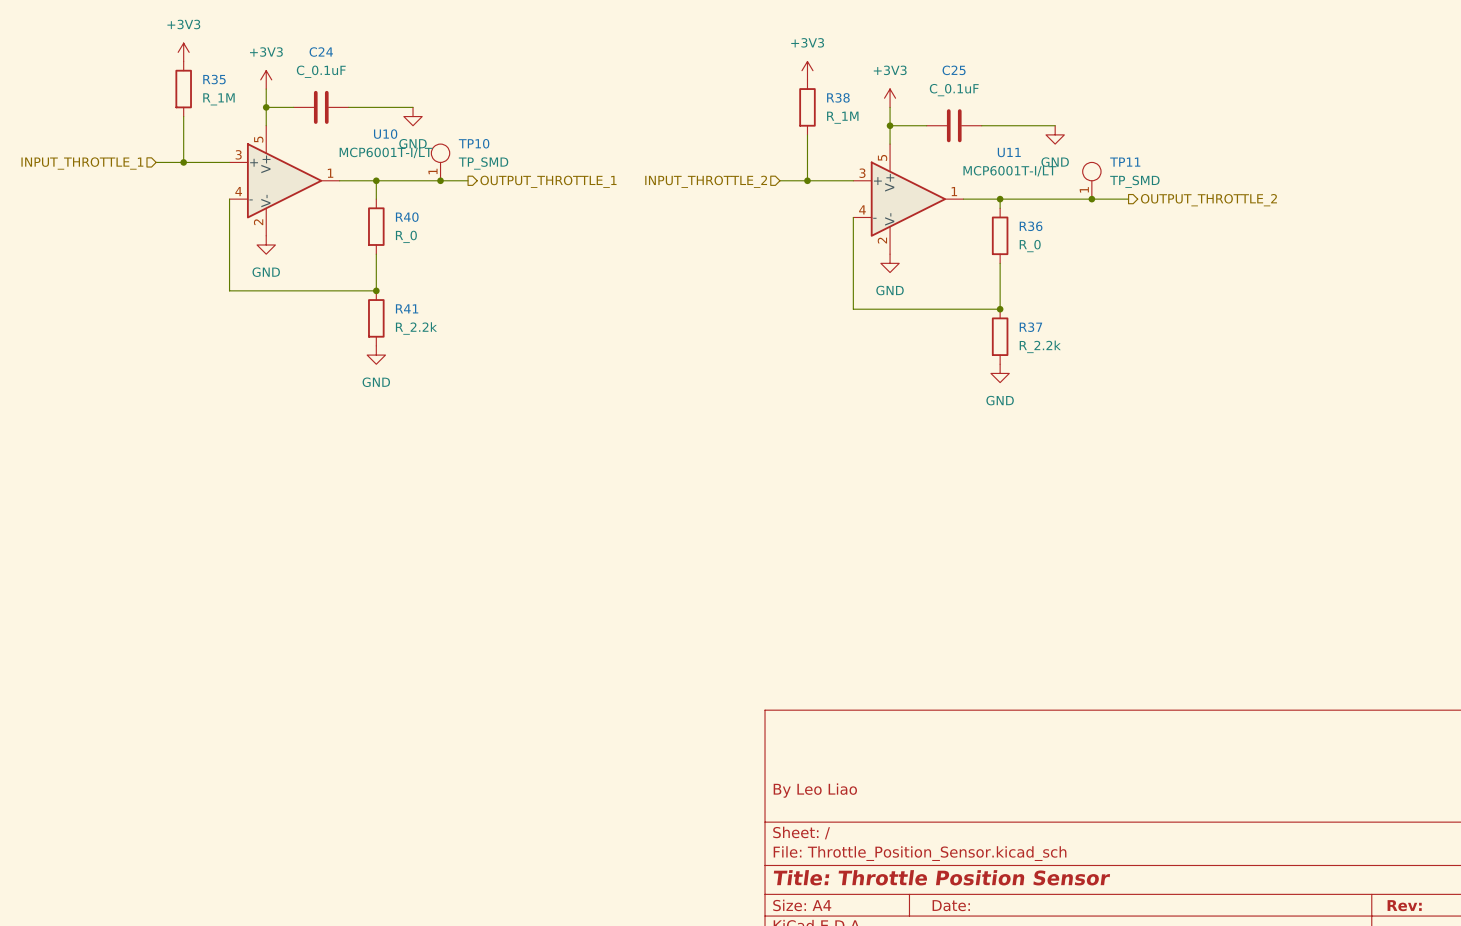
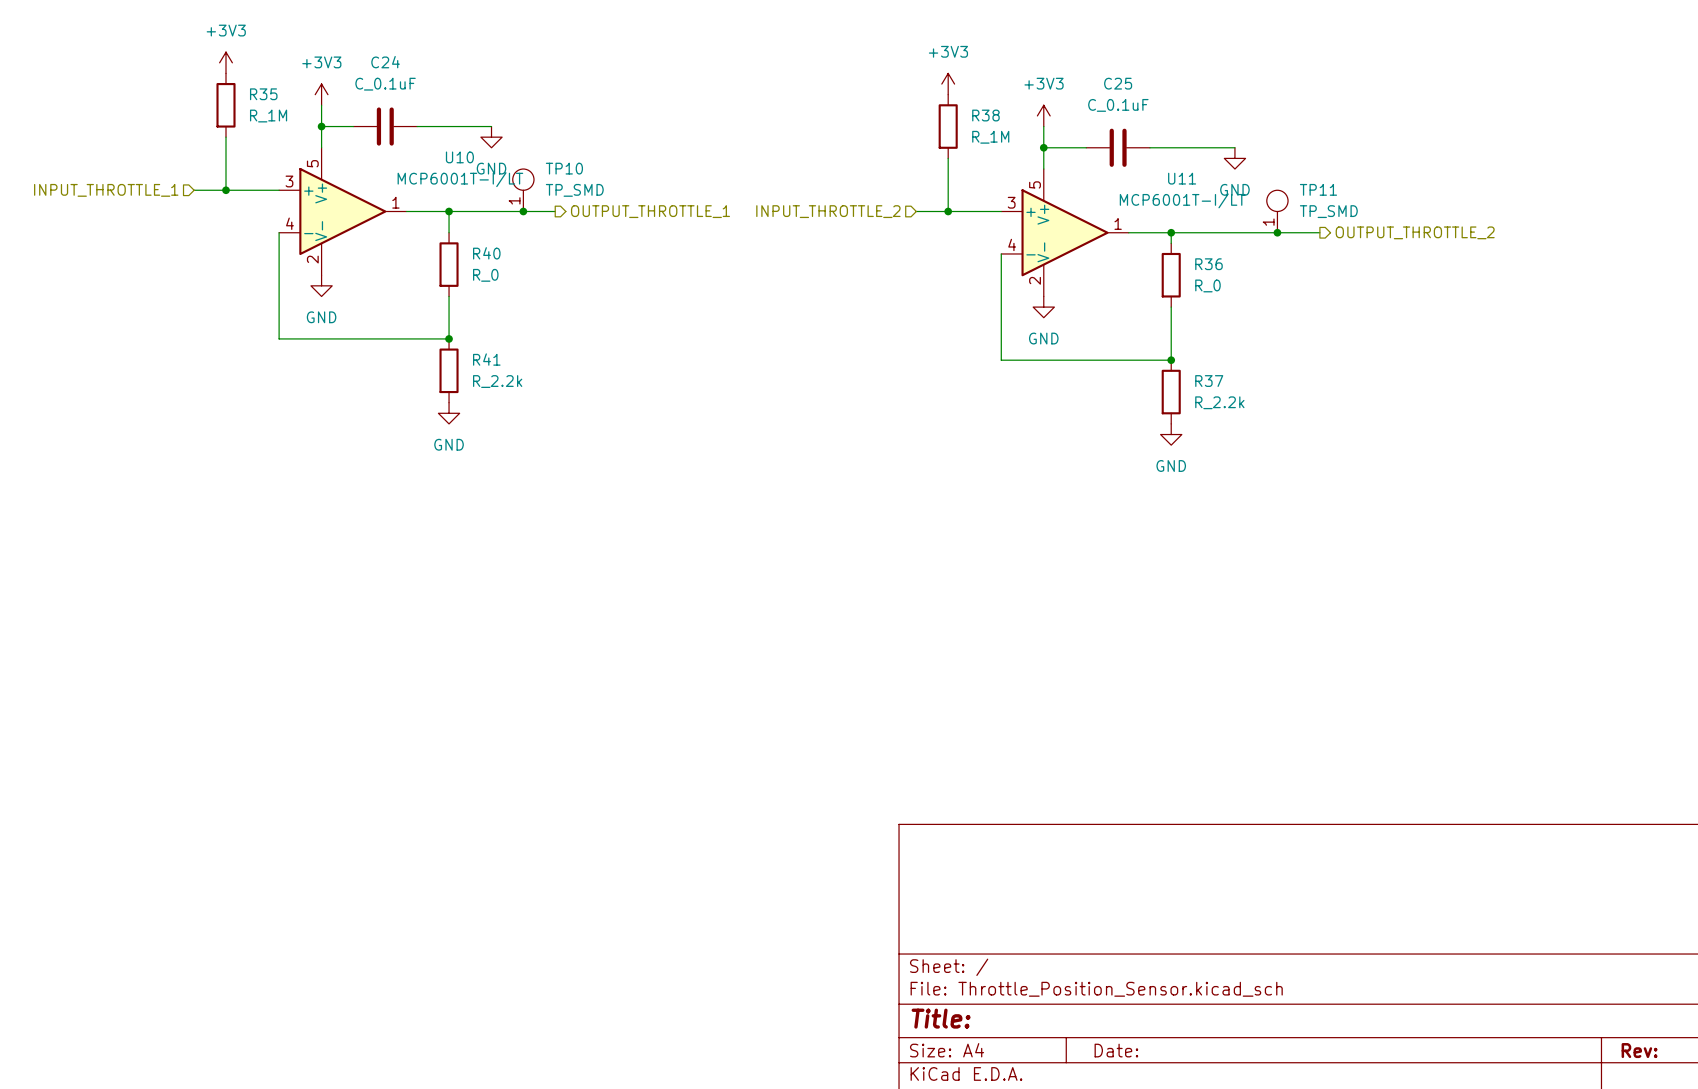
title block: By Leo Liao (815, 790) -> none
title block: Title: Throttle Position Sensor (941, 877) -> Title: (941, 1018)

